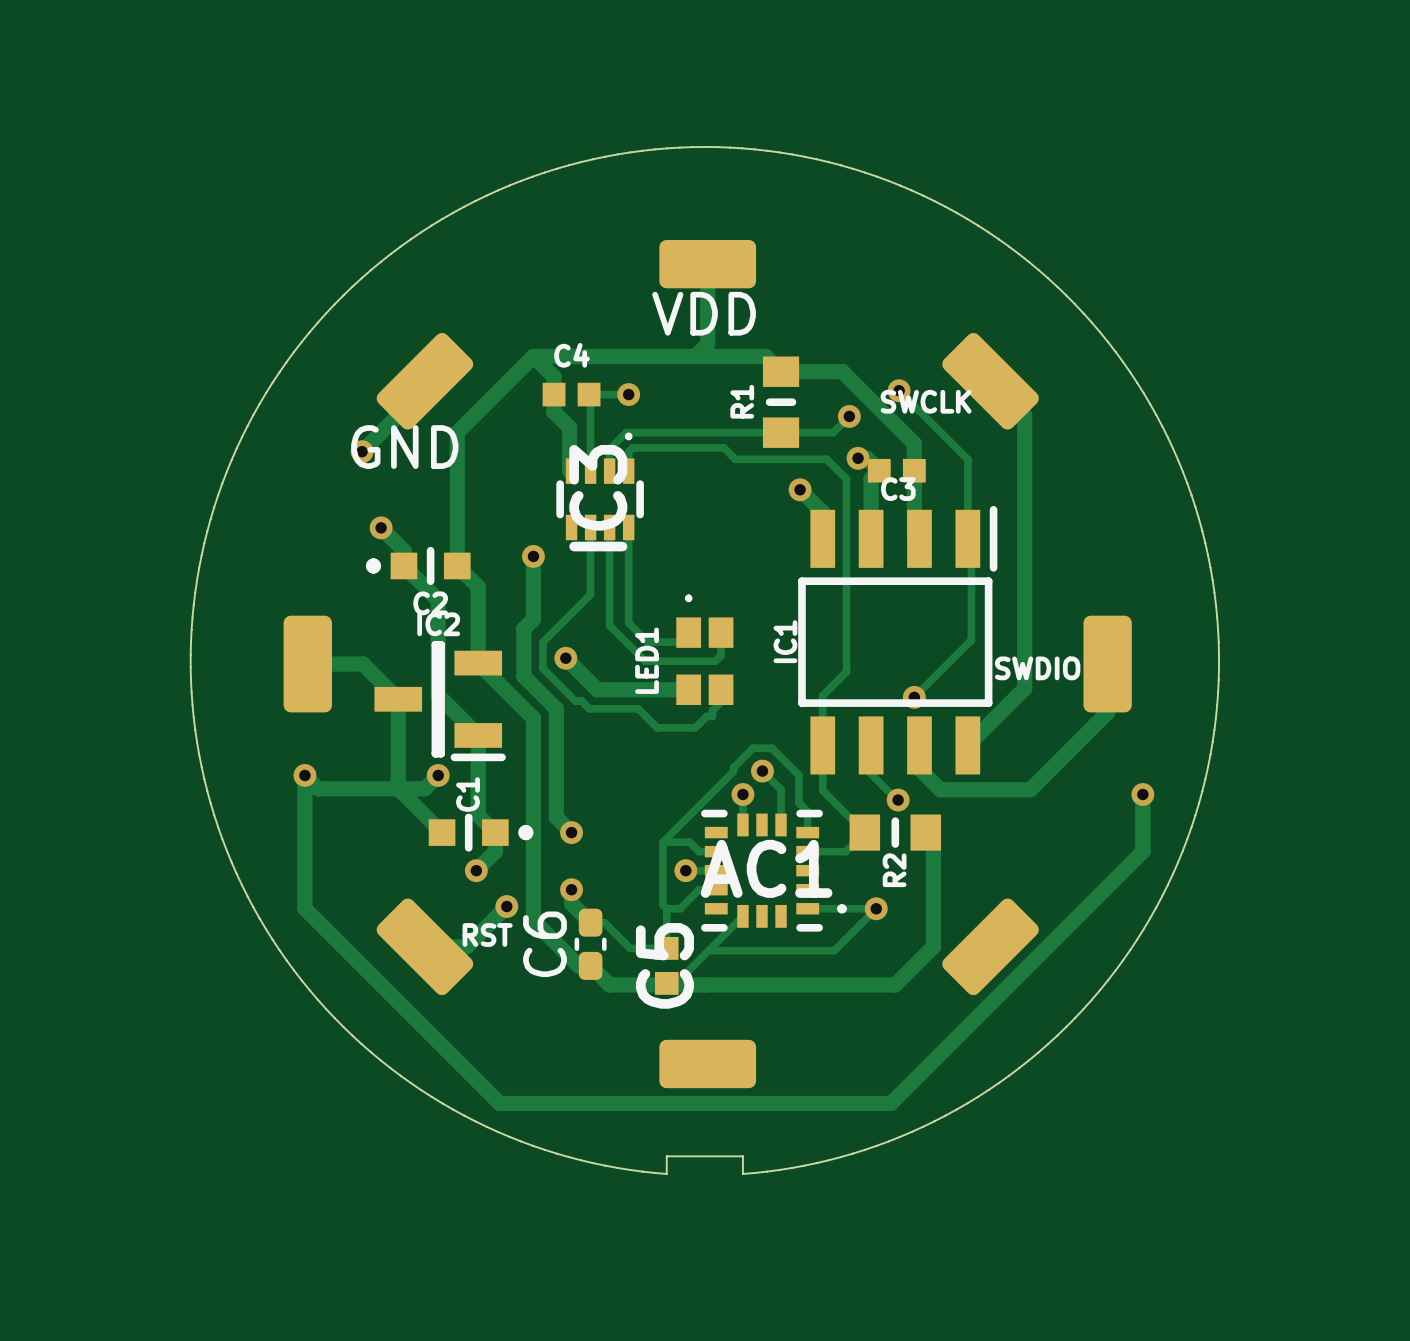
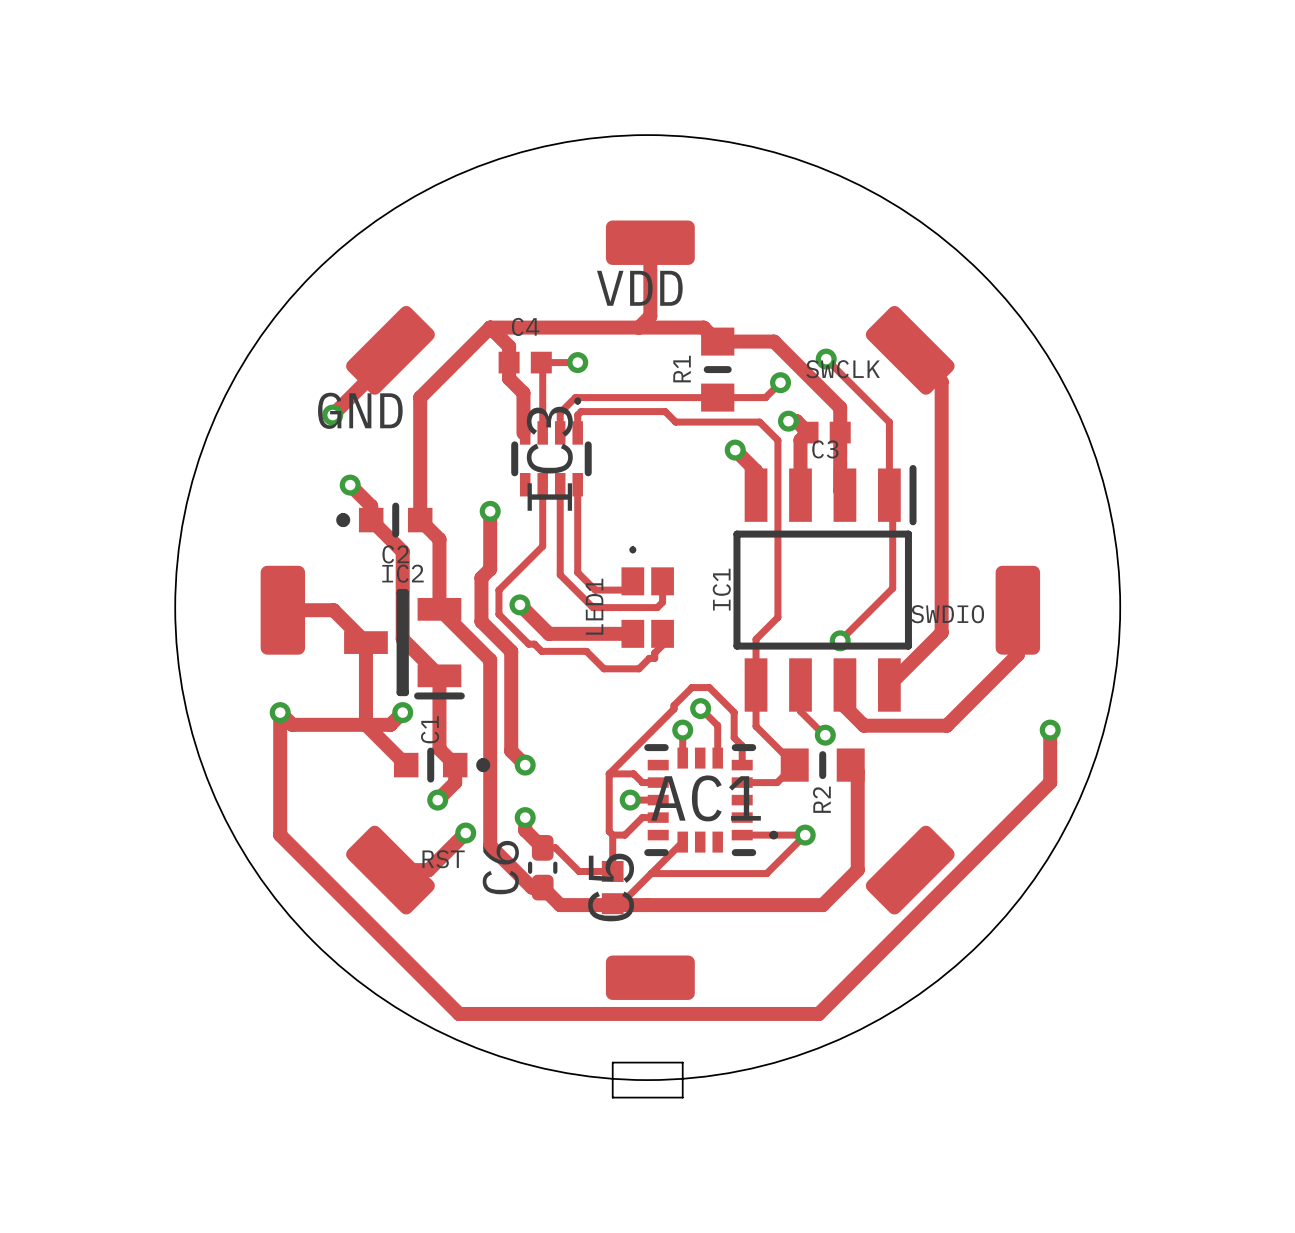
round board edge: none -> [174, 134, 1122, 1081]
board edge: (666, 1173) (617, 1167) (568, 1157) (521, 1141) (475, 1121) (431, 1096) (390, 1068) (352, 1035) (317, 999) (286, 960) (259, 918) (236, 873) (218, 827) (204, 779) (197, 742) (191, 692) (190, 642) (195, 592) (204, 543) (218, 495) (236, 448) (259, 404) (286, 361) (317, 322) (352, 286) (390, 254) (431, 225) (475, 201) (521, 180) (568, 165) (605, 156) (654, 149) (704, 146) (754, 149) (804, 156) (840, 165) (888, 180) (934, 201) (978, 225) (1019, 254) (1057, 286) (1091, 322) (1123, 361) (1150, 404) (1173, 448) (1191, 495) (1205, 543) (1214, 592) (1218, 642) (1218, 692) (1212, 742) (1205, 779) (1191, 827) (1173, 873) (1150, 918) (1123, 960) (1091, 999) (1057, 1035) (1019, 1068) (978, 1096) (934, 1121) (888, 1141) (840, 1157) (792, 1167) (742, 1173) -> (612, 1078) (612, 1097) (682, 1097) (682, 1078)

